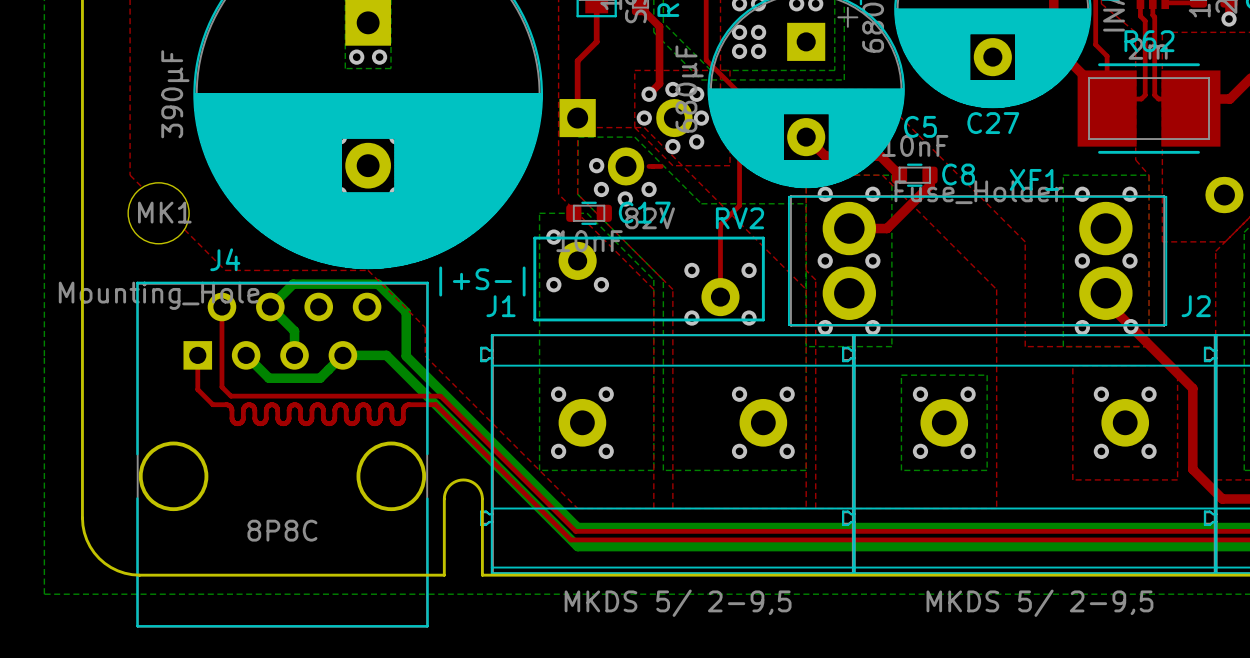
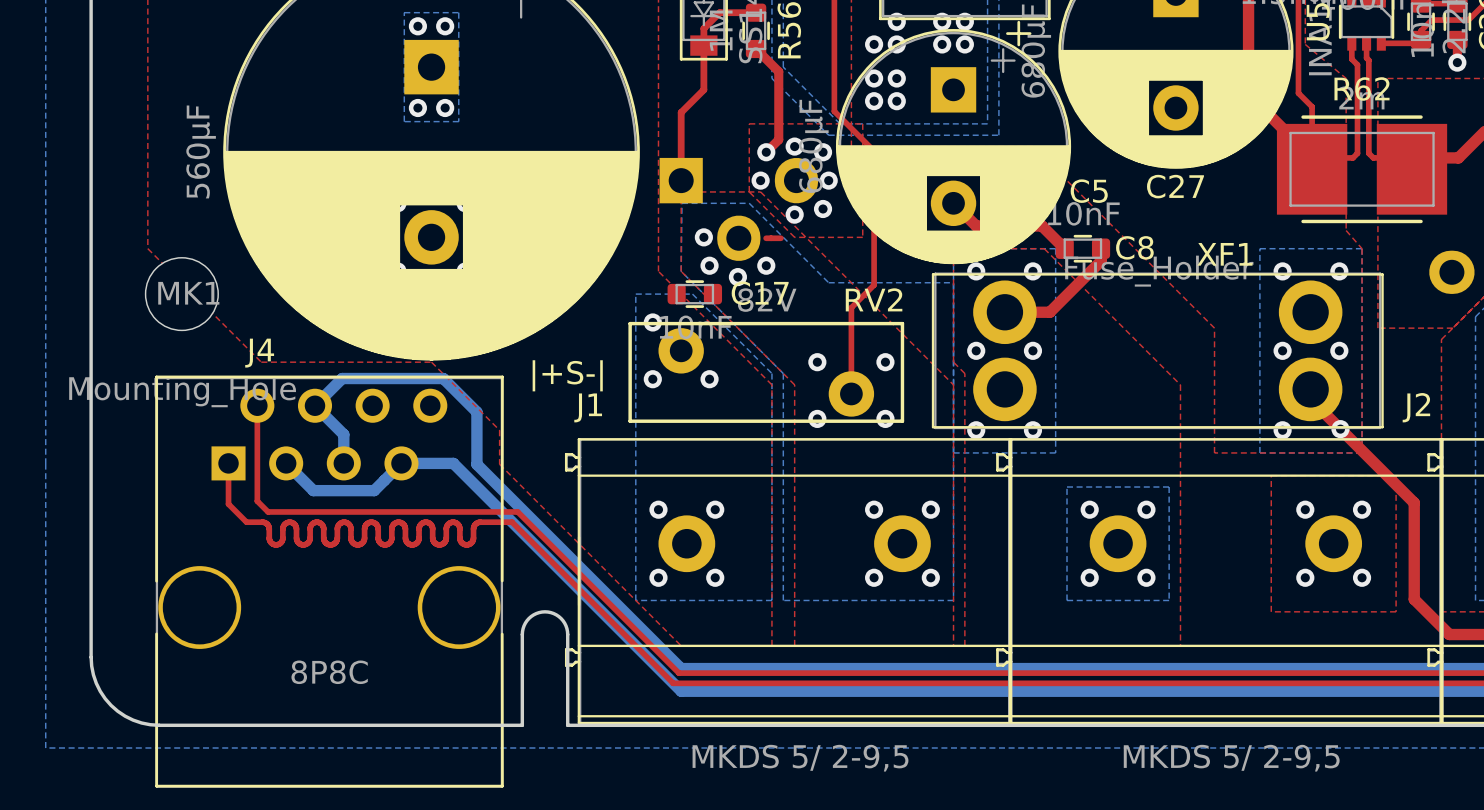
part value: 390µF (175, 94) -> 560µF (201, 151)

